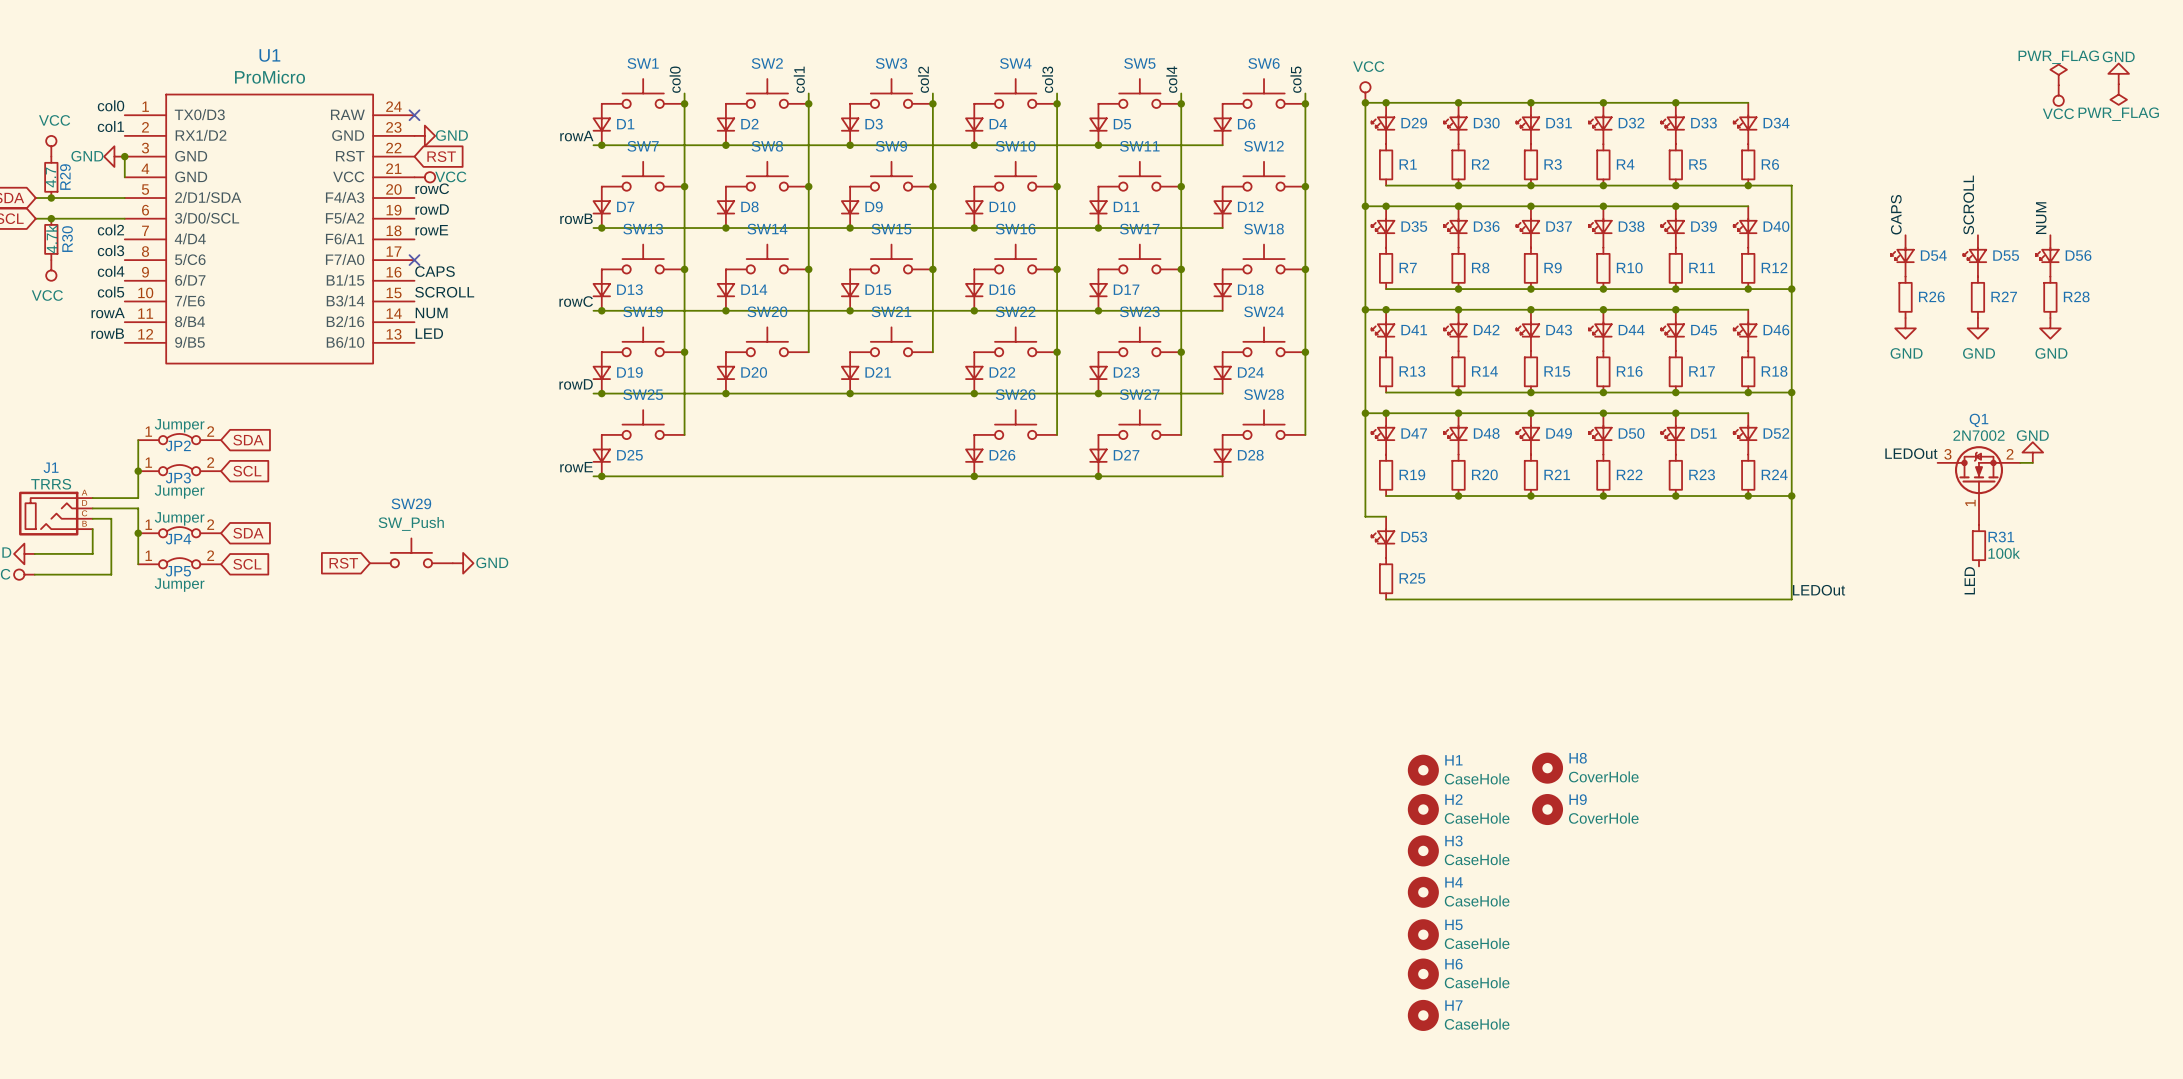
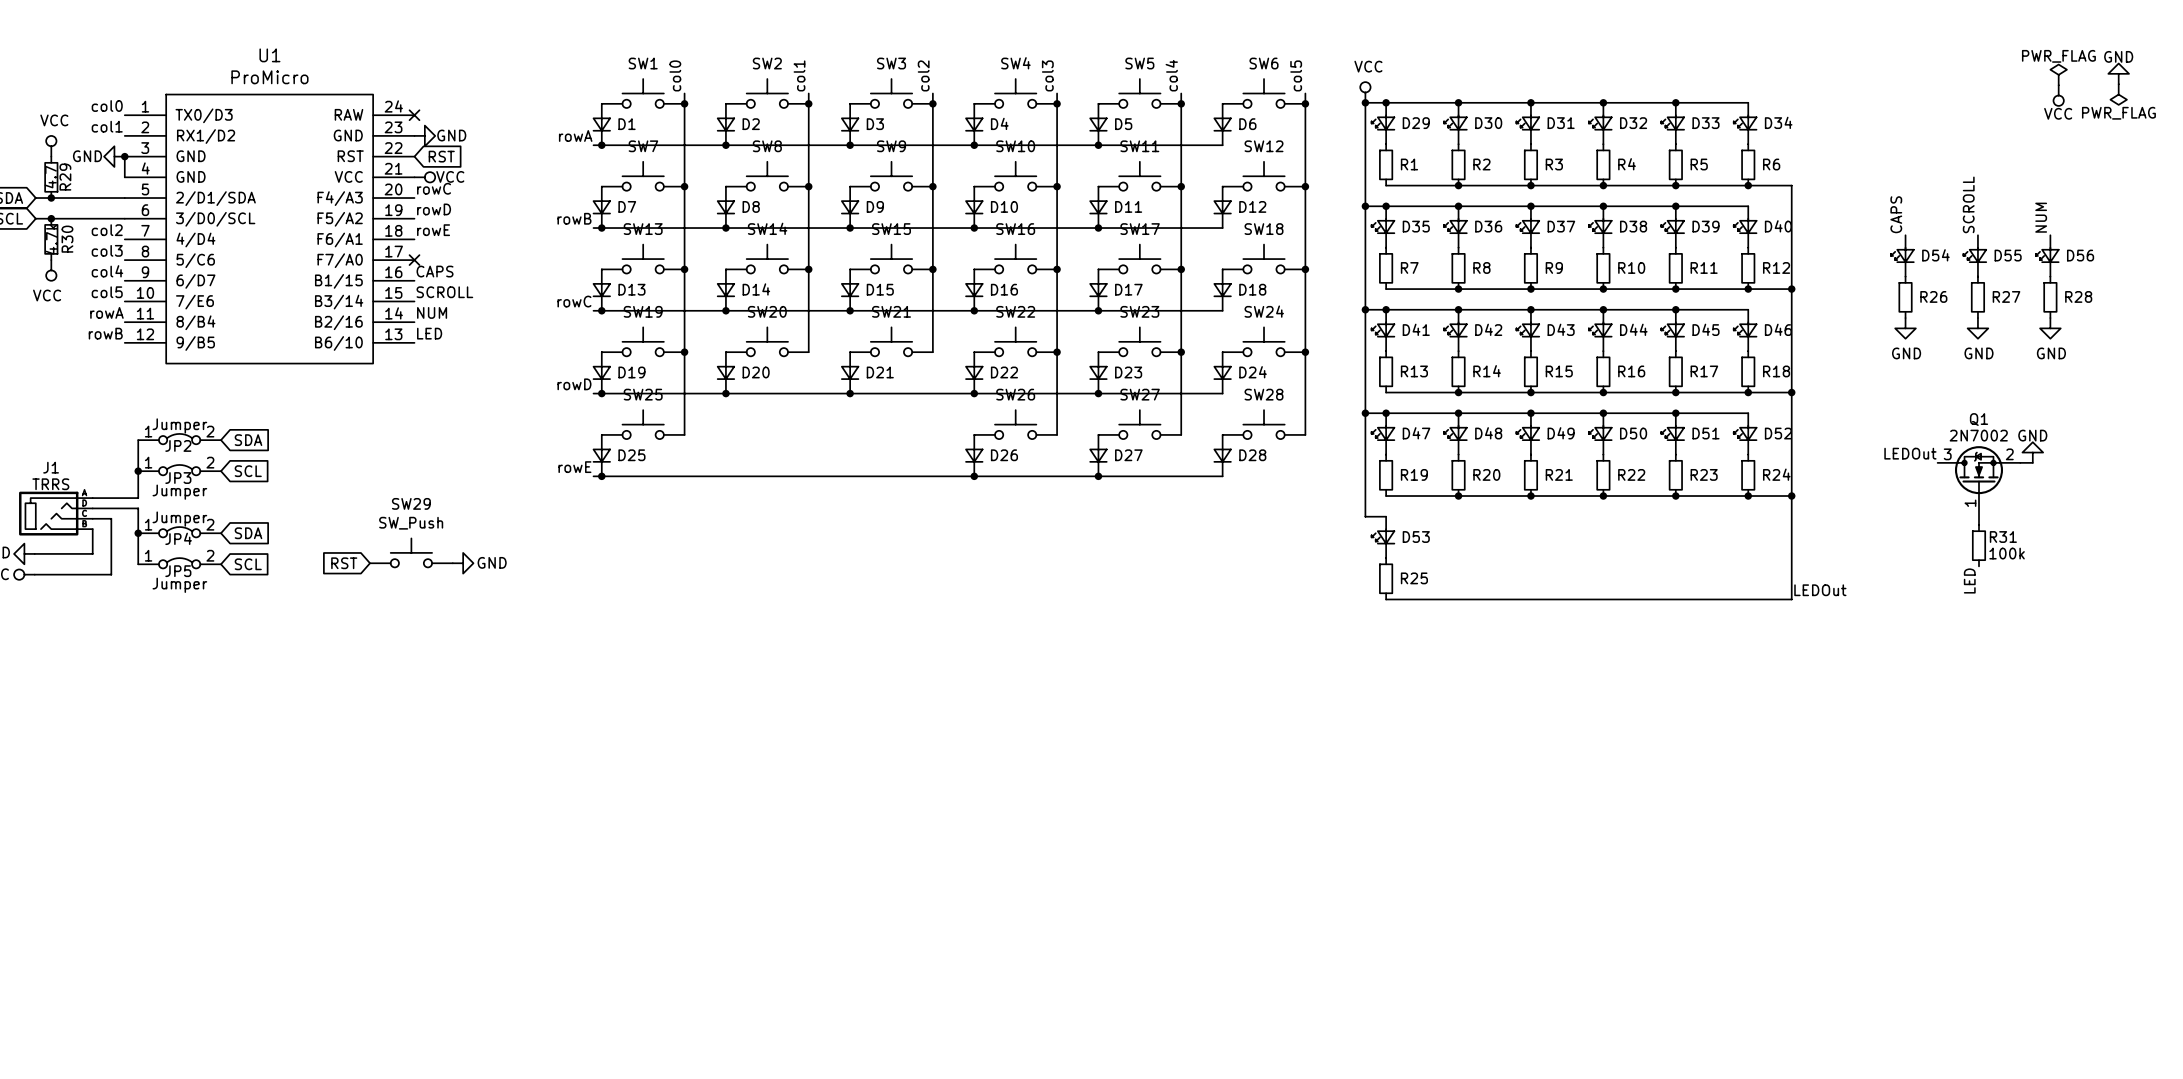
H8: CoverHole (1547, 768) -> none
H1: CaseHole (1423, 770) -> none
H2: CaseHole (1423, 809) -> none
H9: CoverHole (1547, 809) -> none
H3: CaseHole (1423, 850) -> none
H4: CaseHole (1423, 892) -> none
H5: CaseHole (1423, 934) -> none
H6: CaseHole (1423, 974) -> none
H7: CaseHole (1423, 1015) -> none

